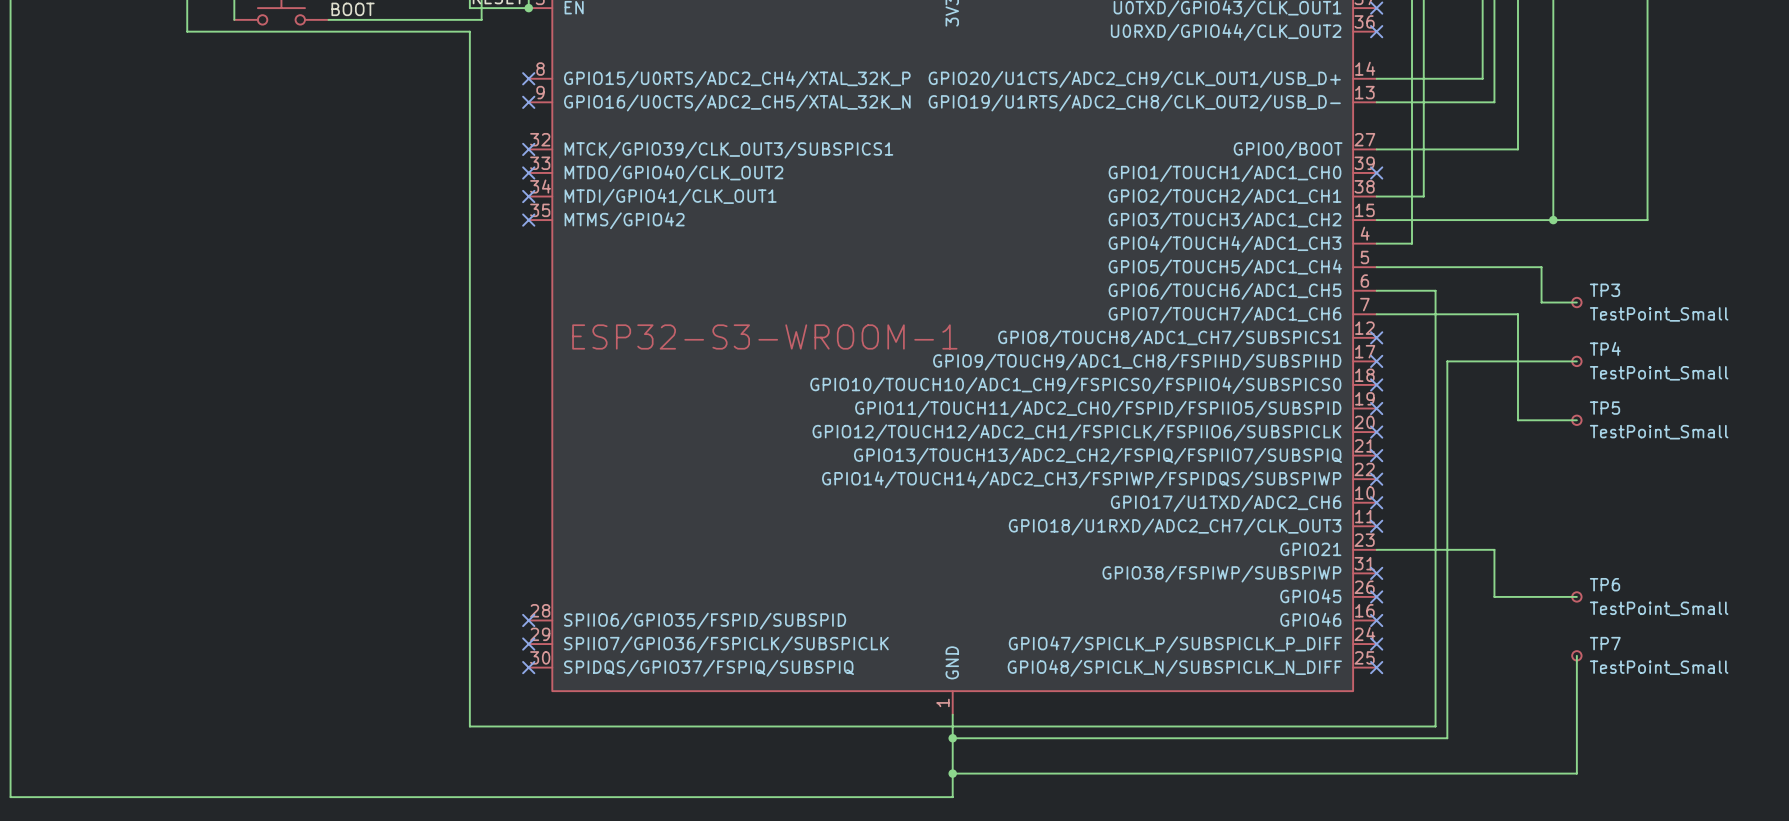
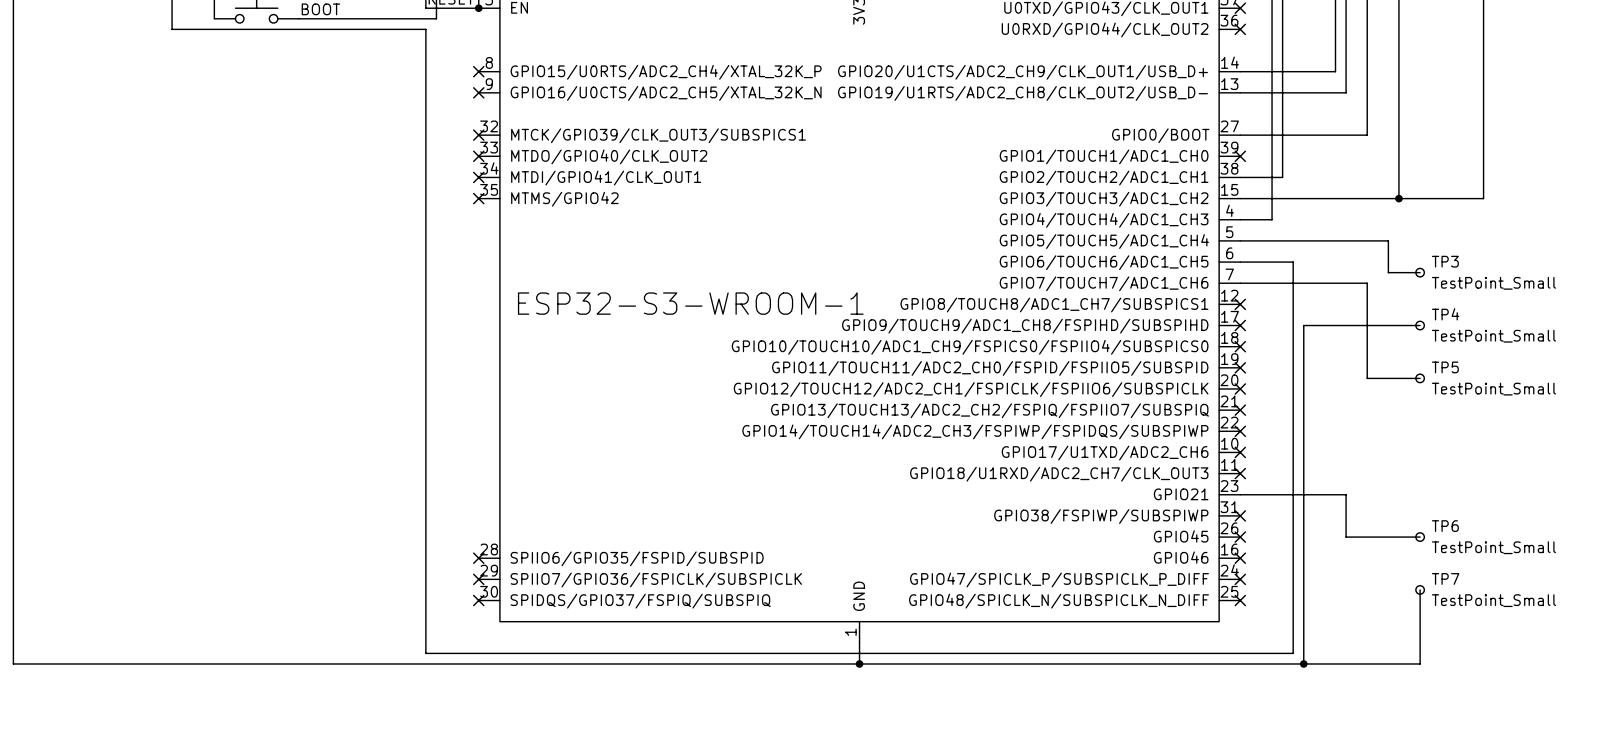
wire: (10, 738) (10, 797) (952, 797) (952, 738) -> (13, 663) (859, 663)
junction: none -> (1303, 663)
wire: (1576, 738) (1576, 773) (952, 773) -> (1420, 663) (1303, 663)
junction: (952, 773) -> none

